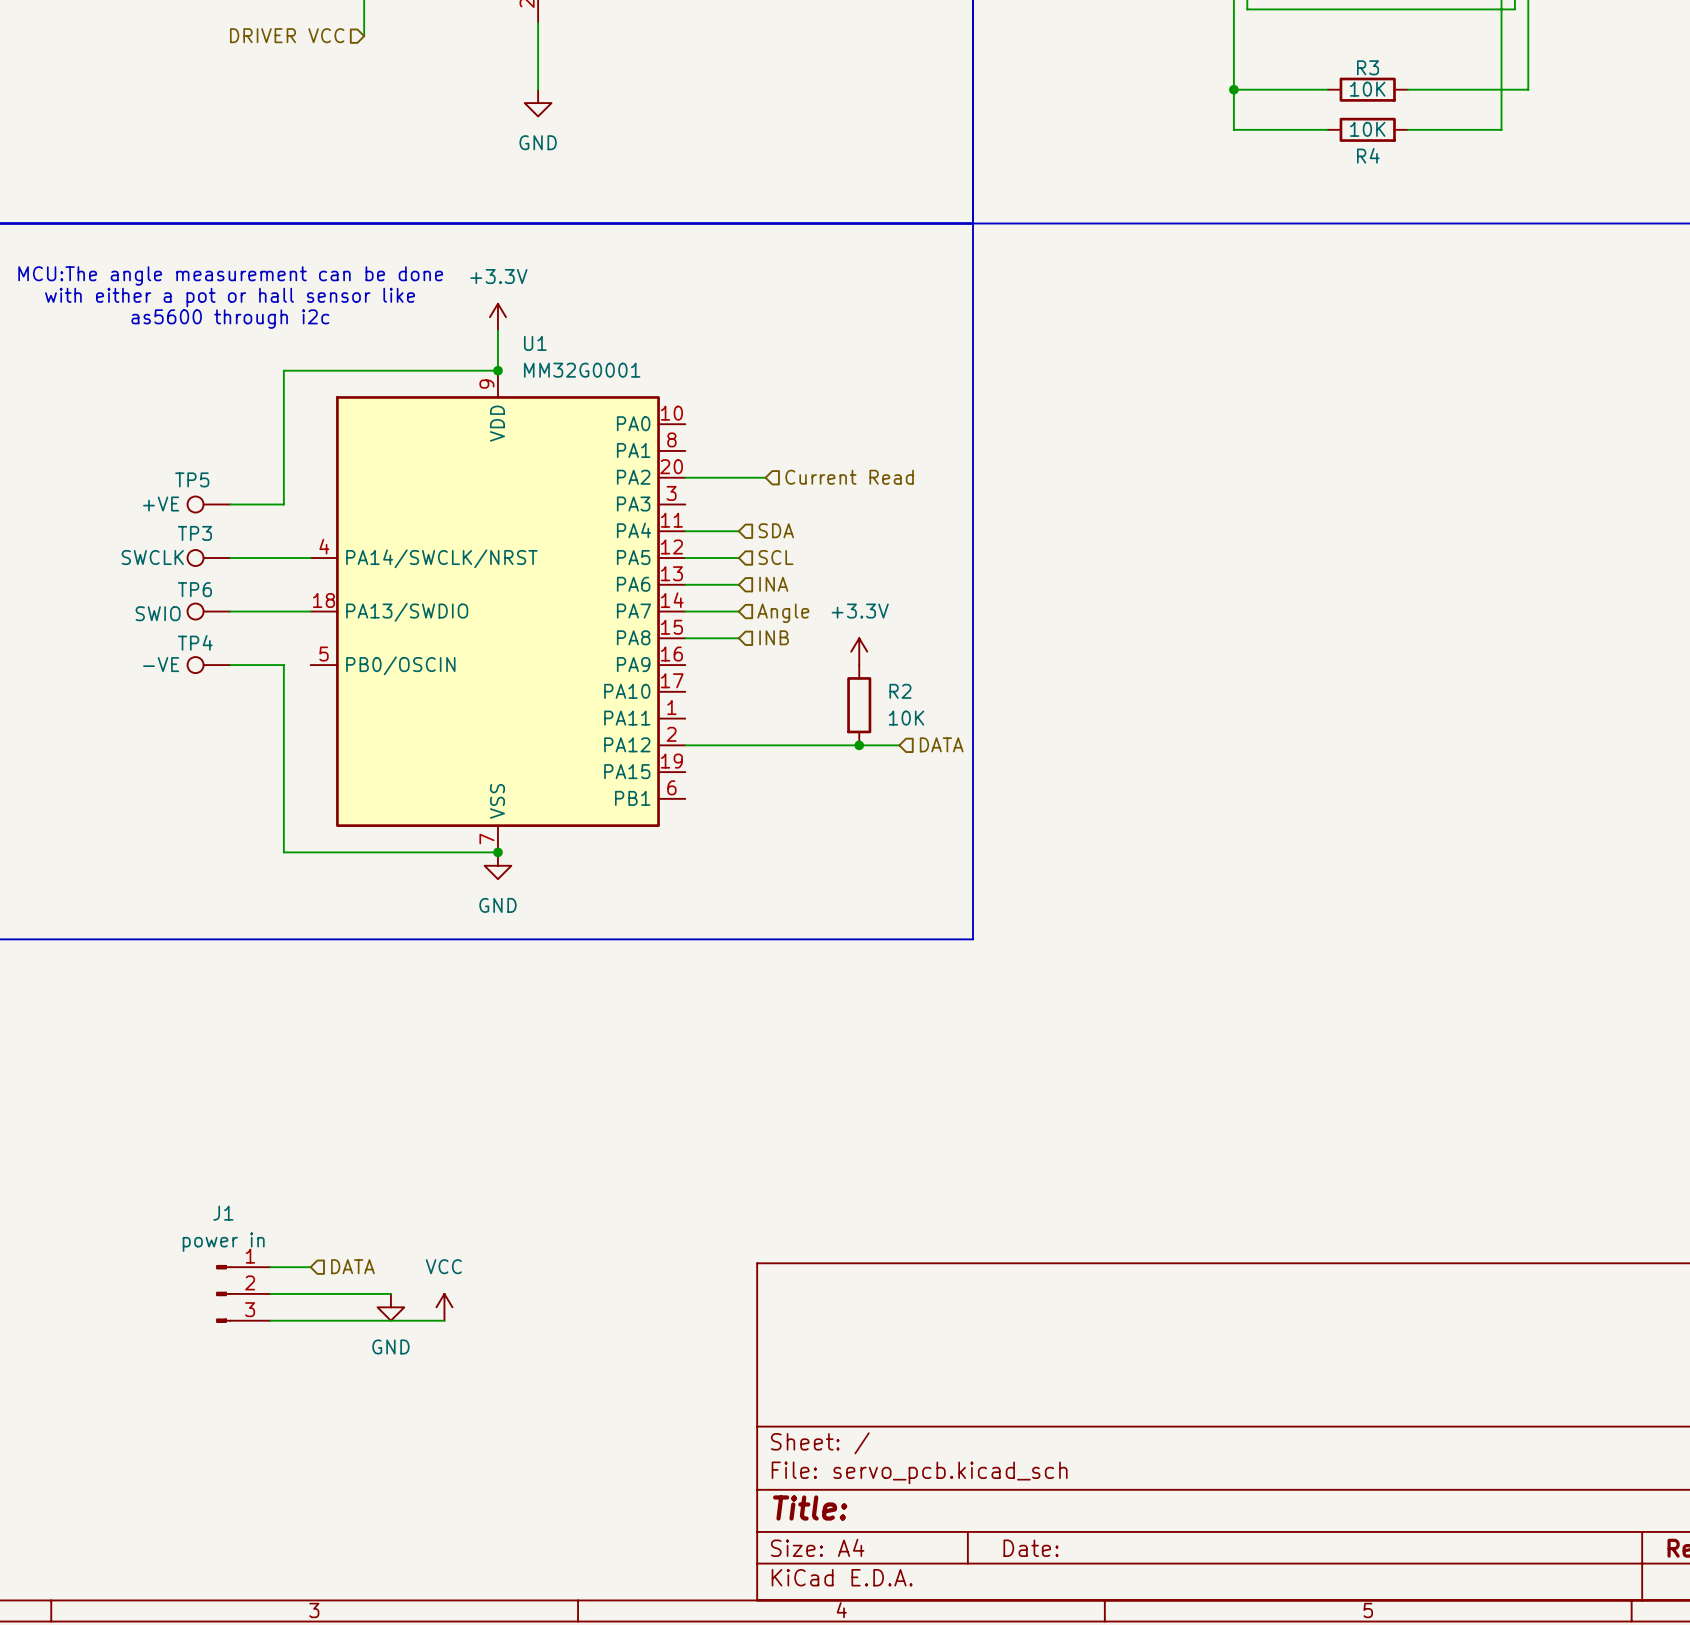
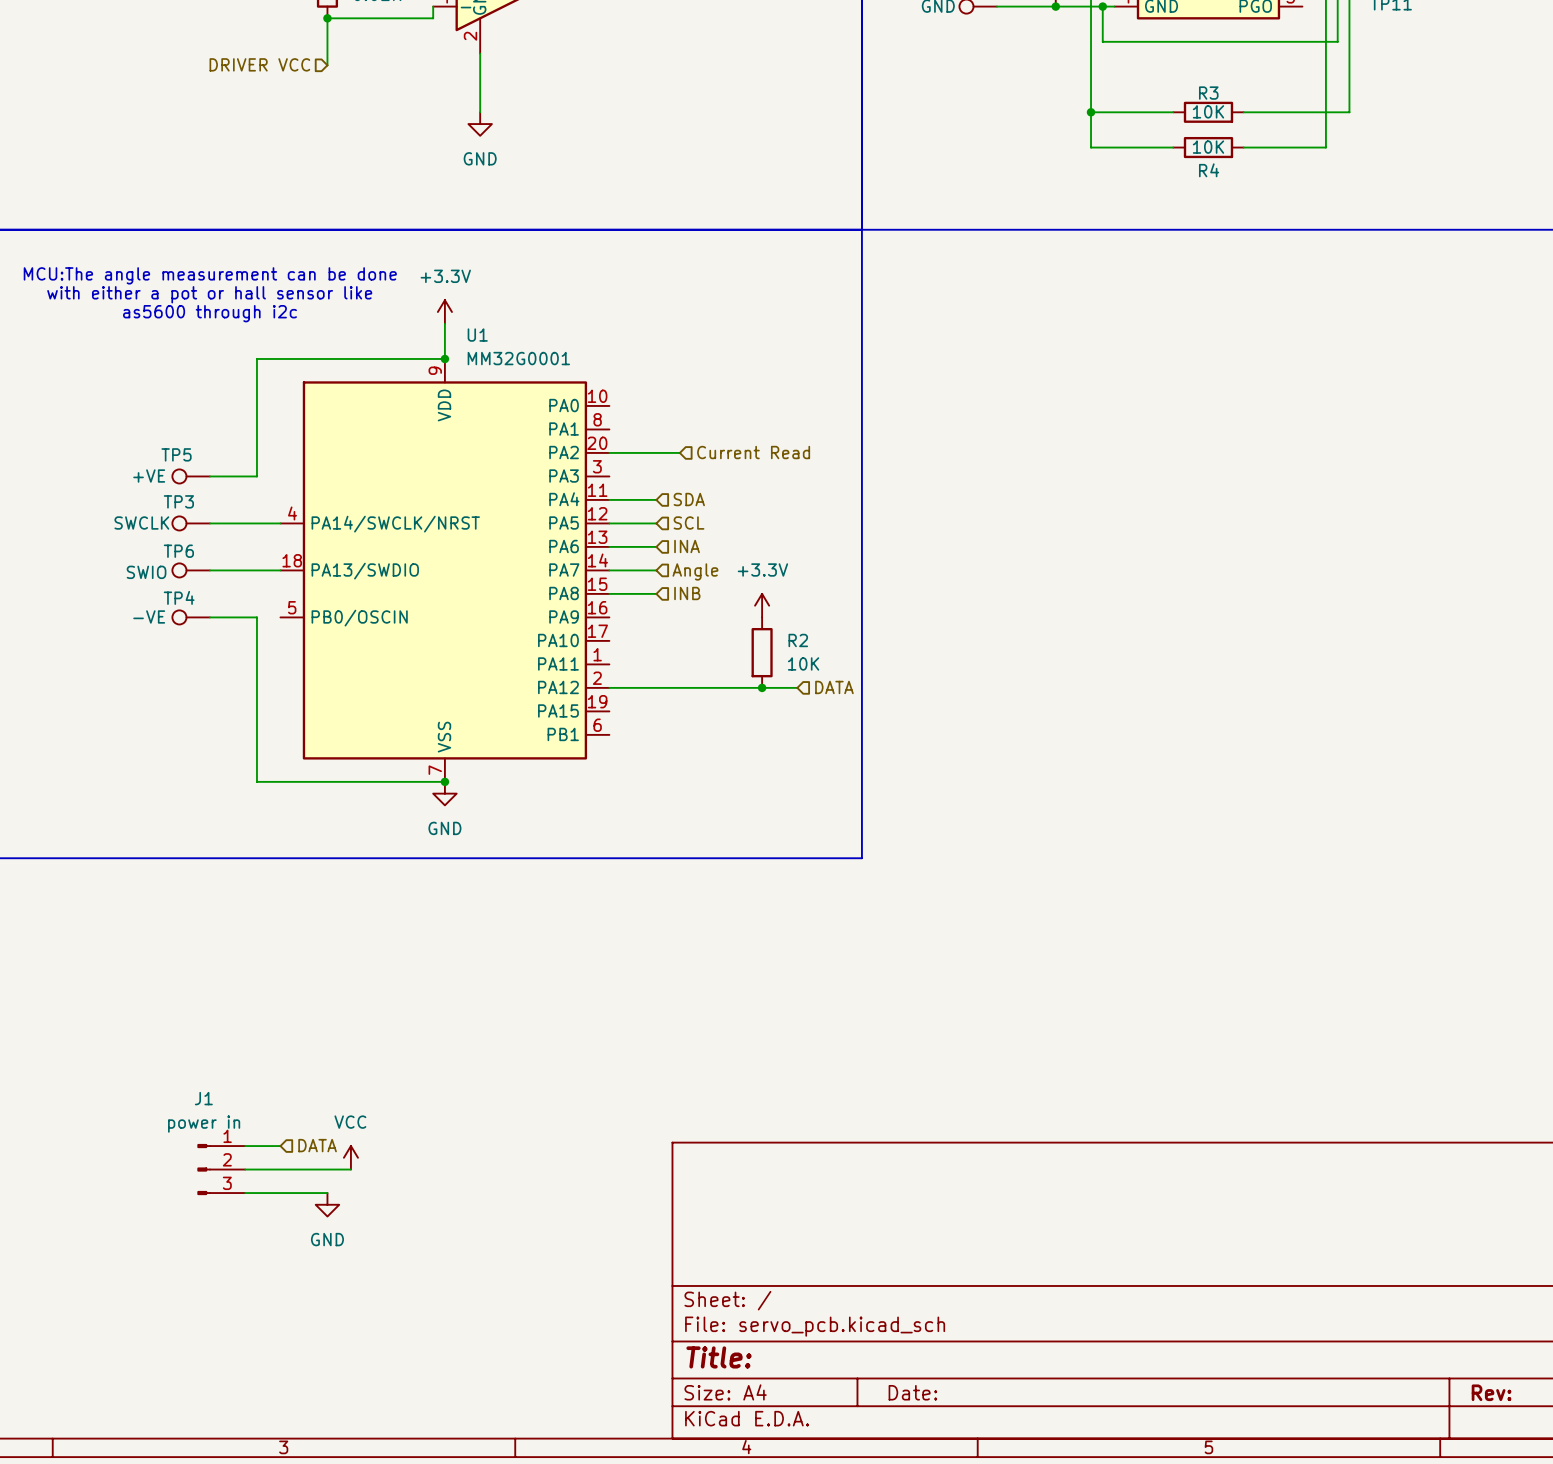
power symbol position: GND (390, 1307) -> GND (327, 1204)
power symbol position: VCC (444, 1307) -> VCC (350, 1157)
wire: (364, 1320) (444, 1320) -> none

